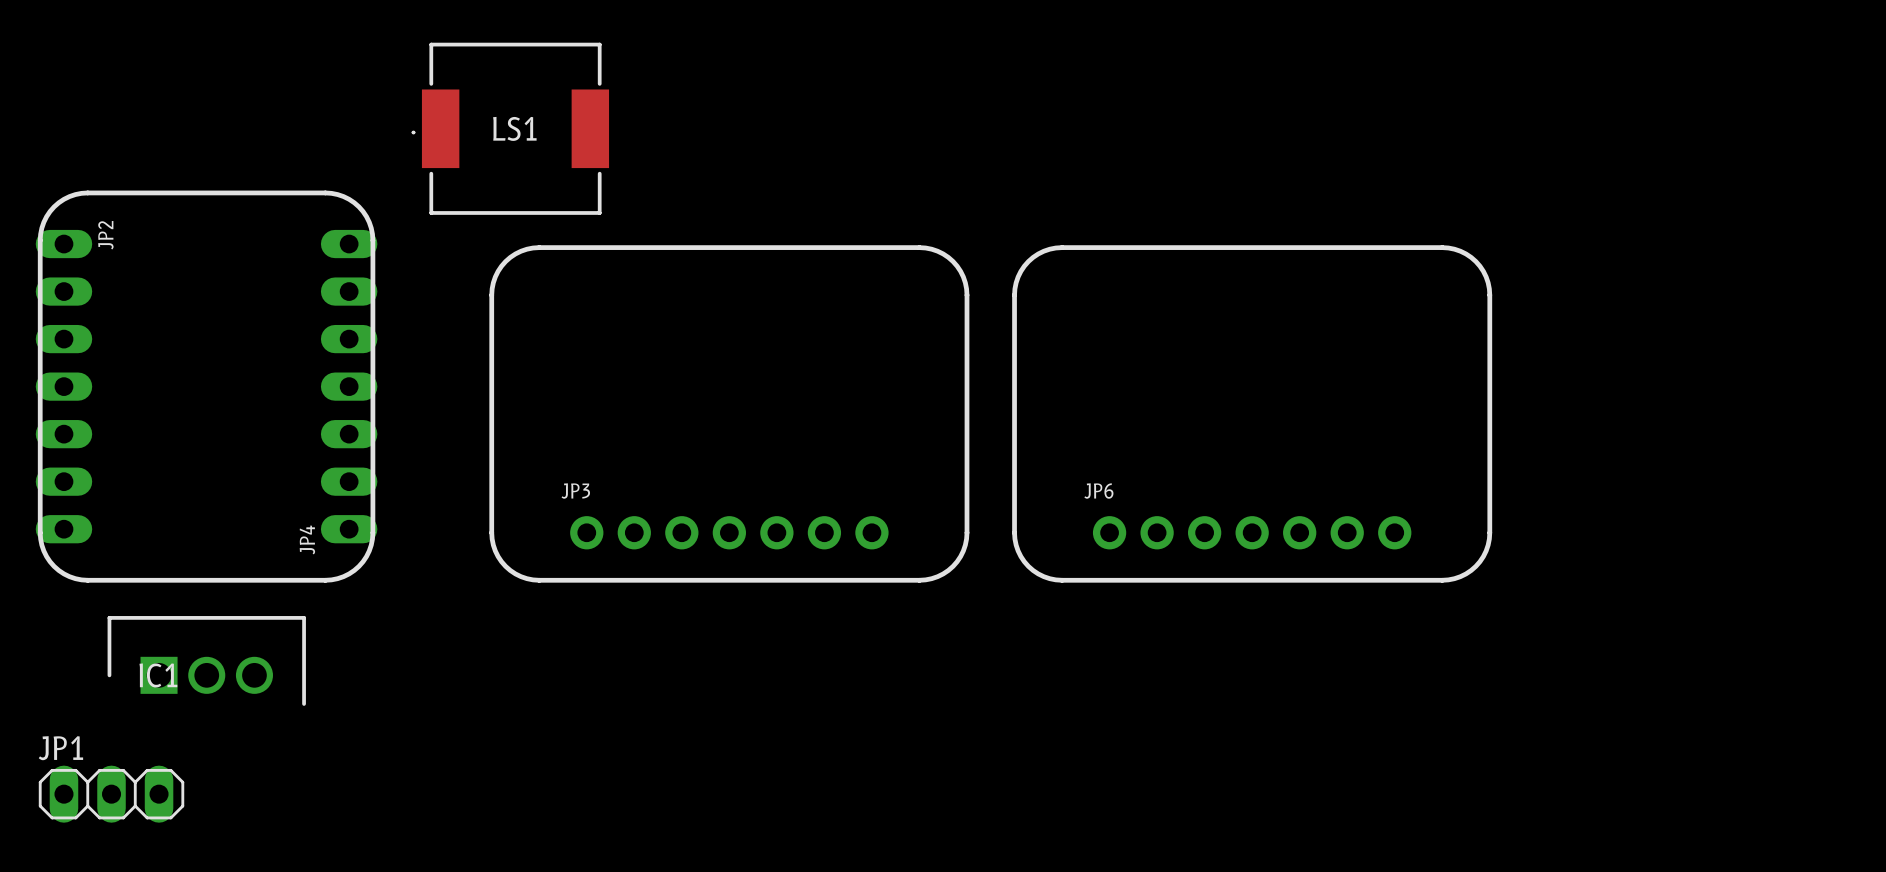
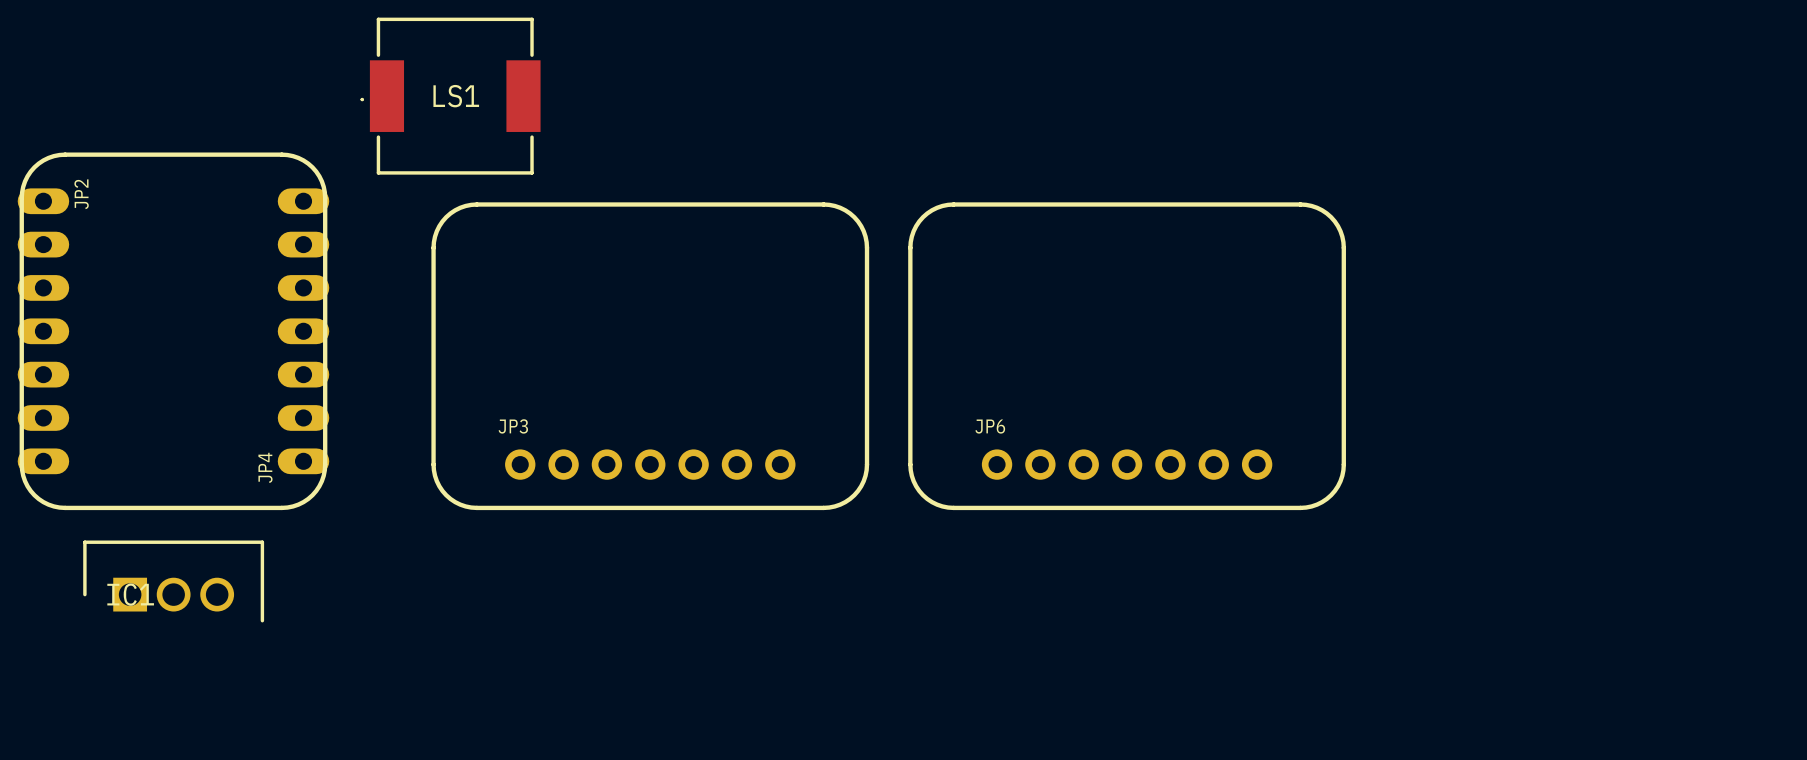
JP1: (111, 794) -> none

